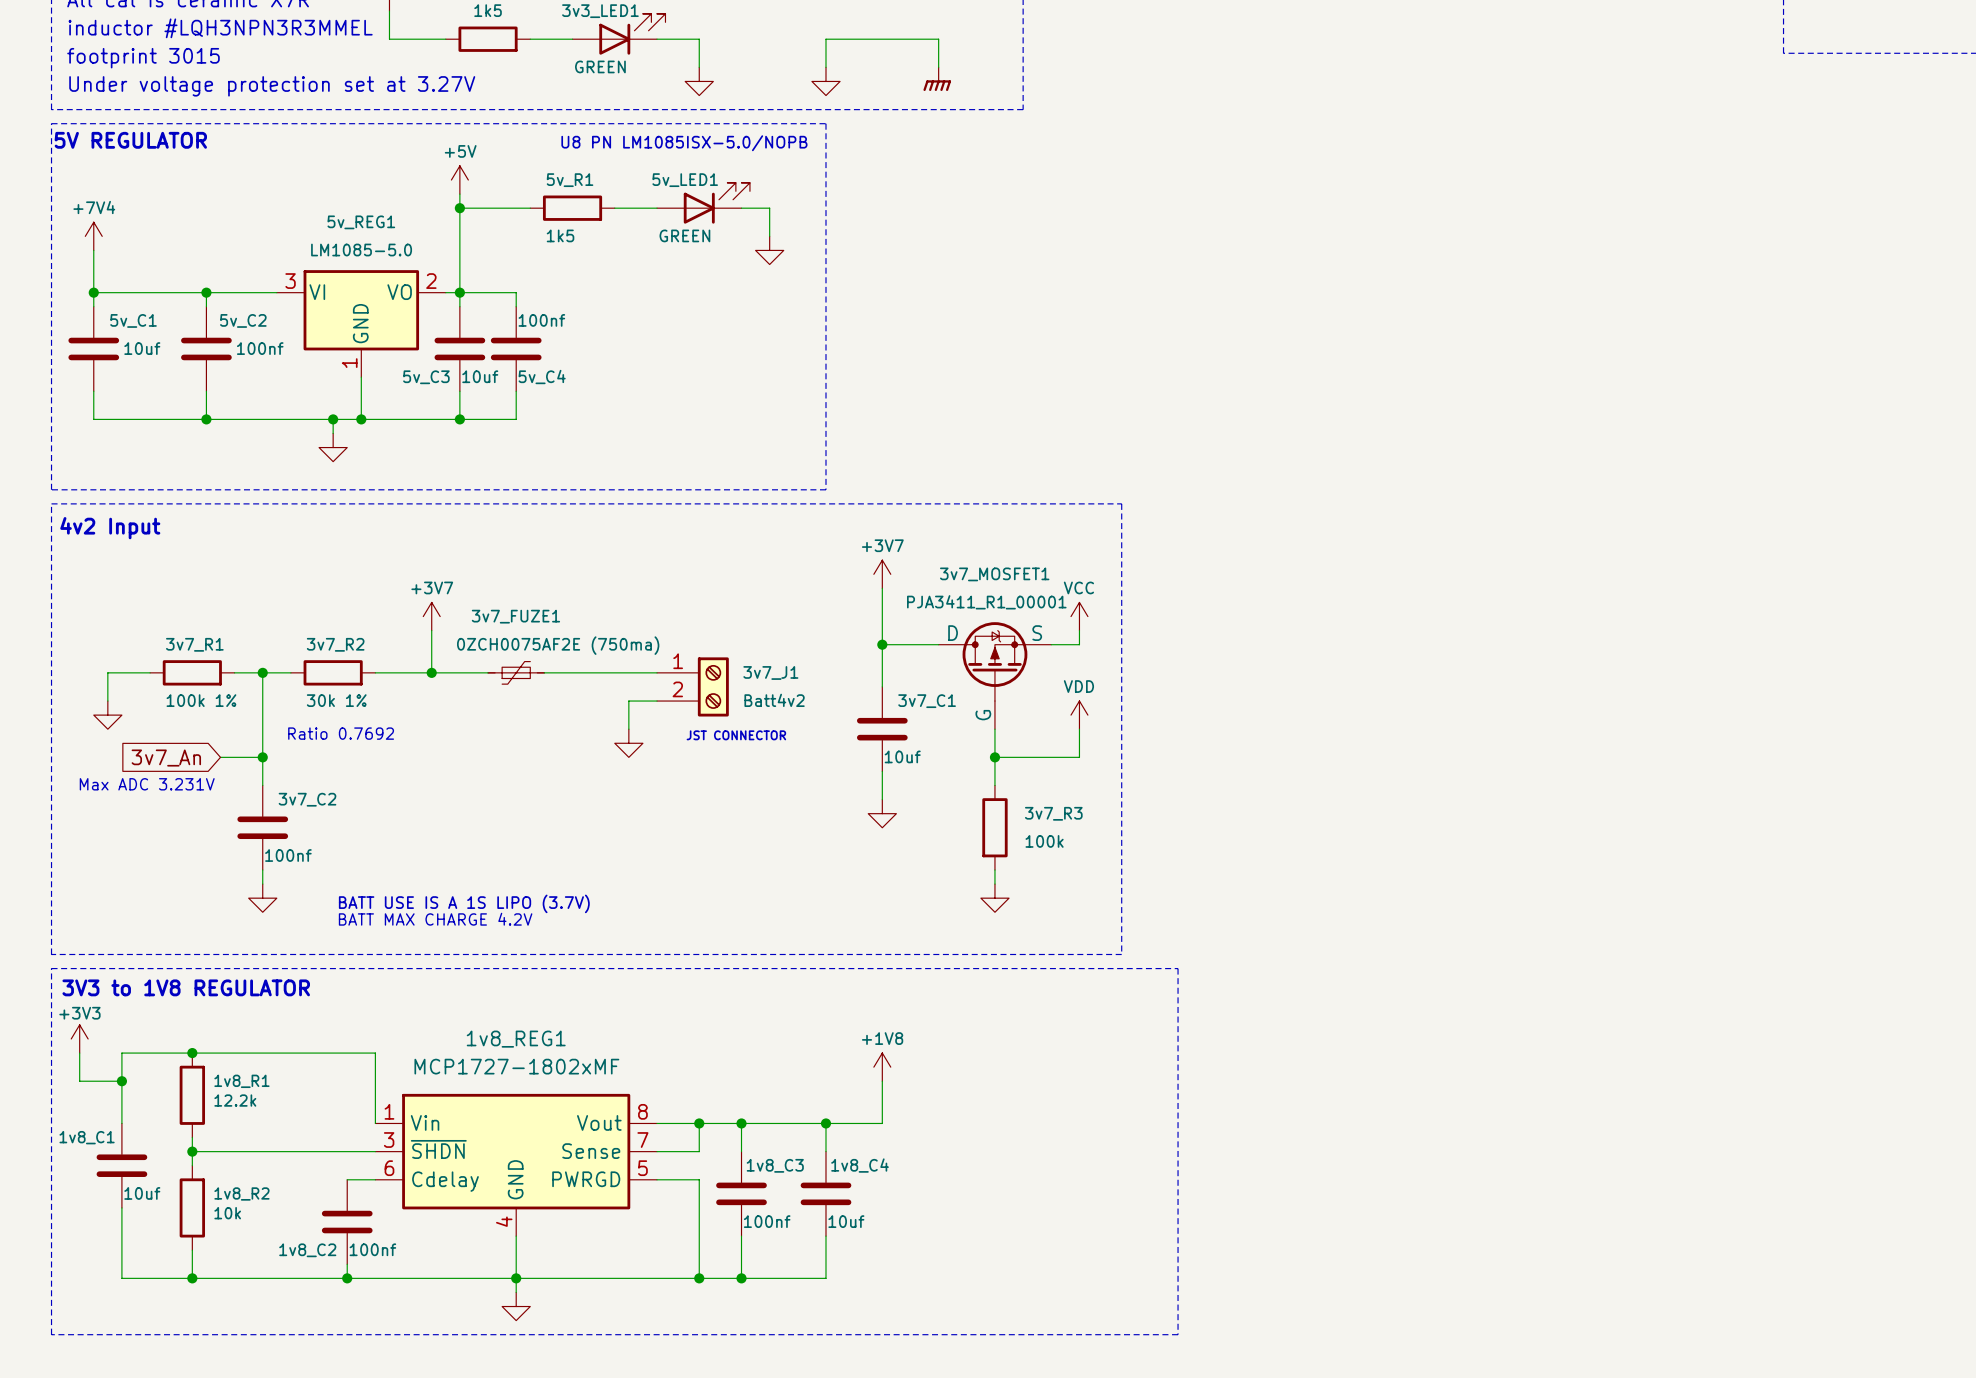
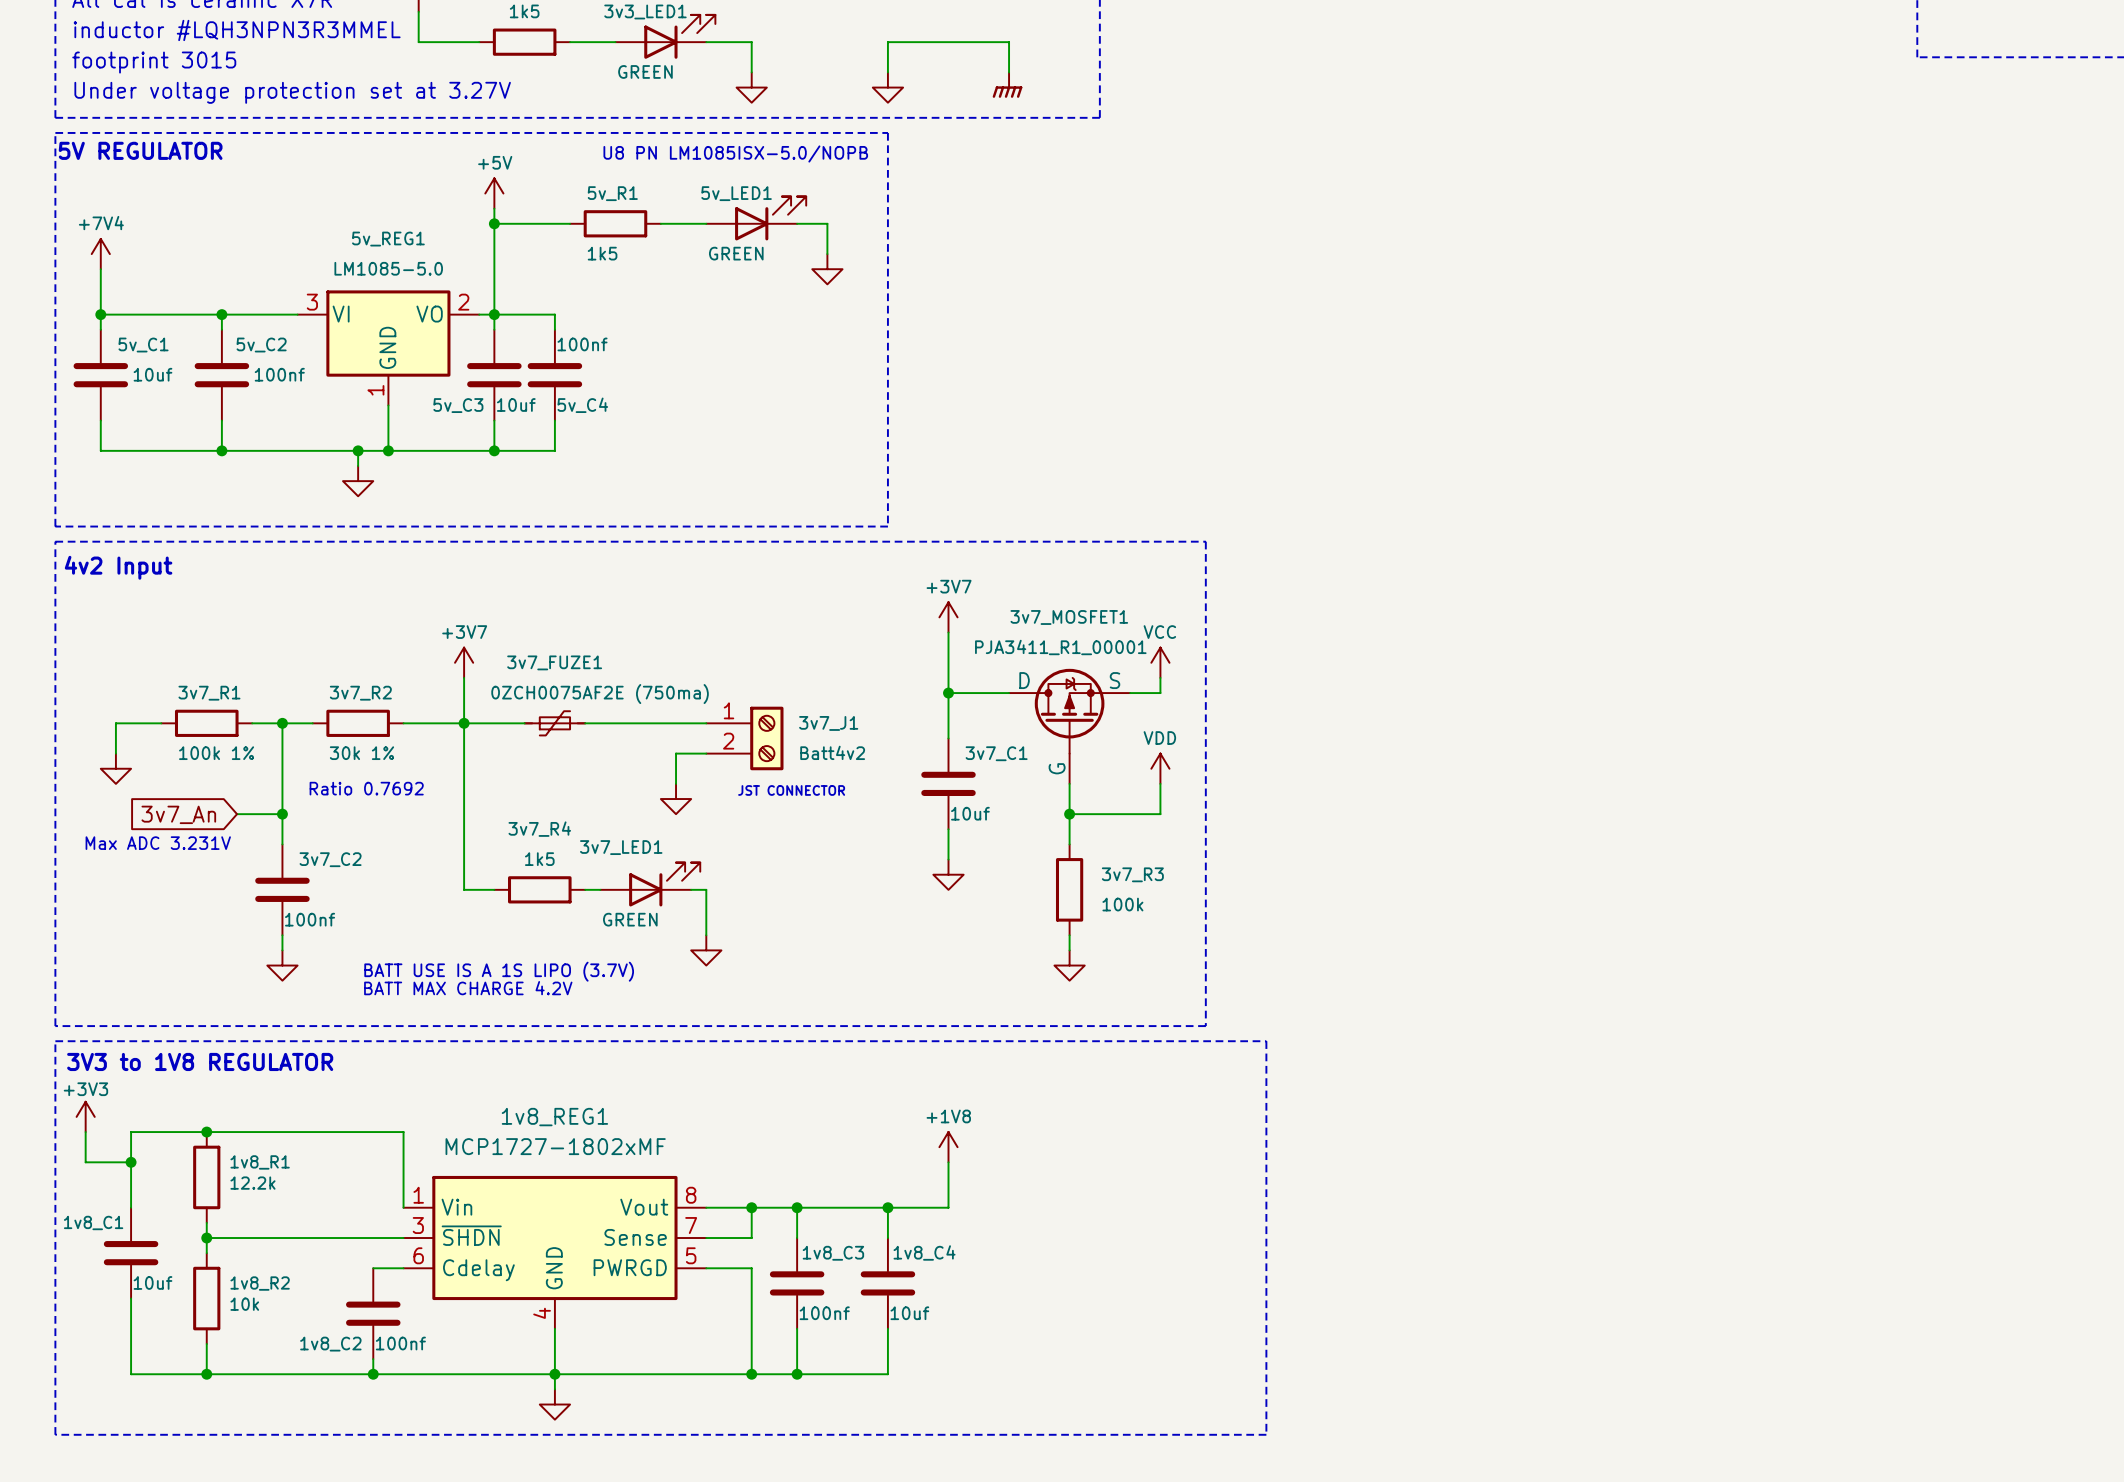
wire: none -> (464, 723) (464, 889) (494, 889)
3v7_LED1: none -> GREEN (650, 884)
3v7_R4: none -> 1k5 (539, 889)
wire: none -> (585, 889) (600, 889)
wire: none -> (691, 889) (706, 889) (706, 935)
power symbol: none -> (706, 950)

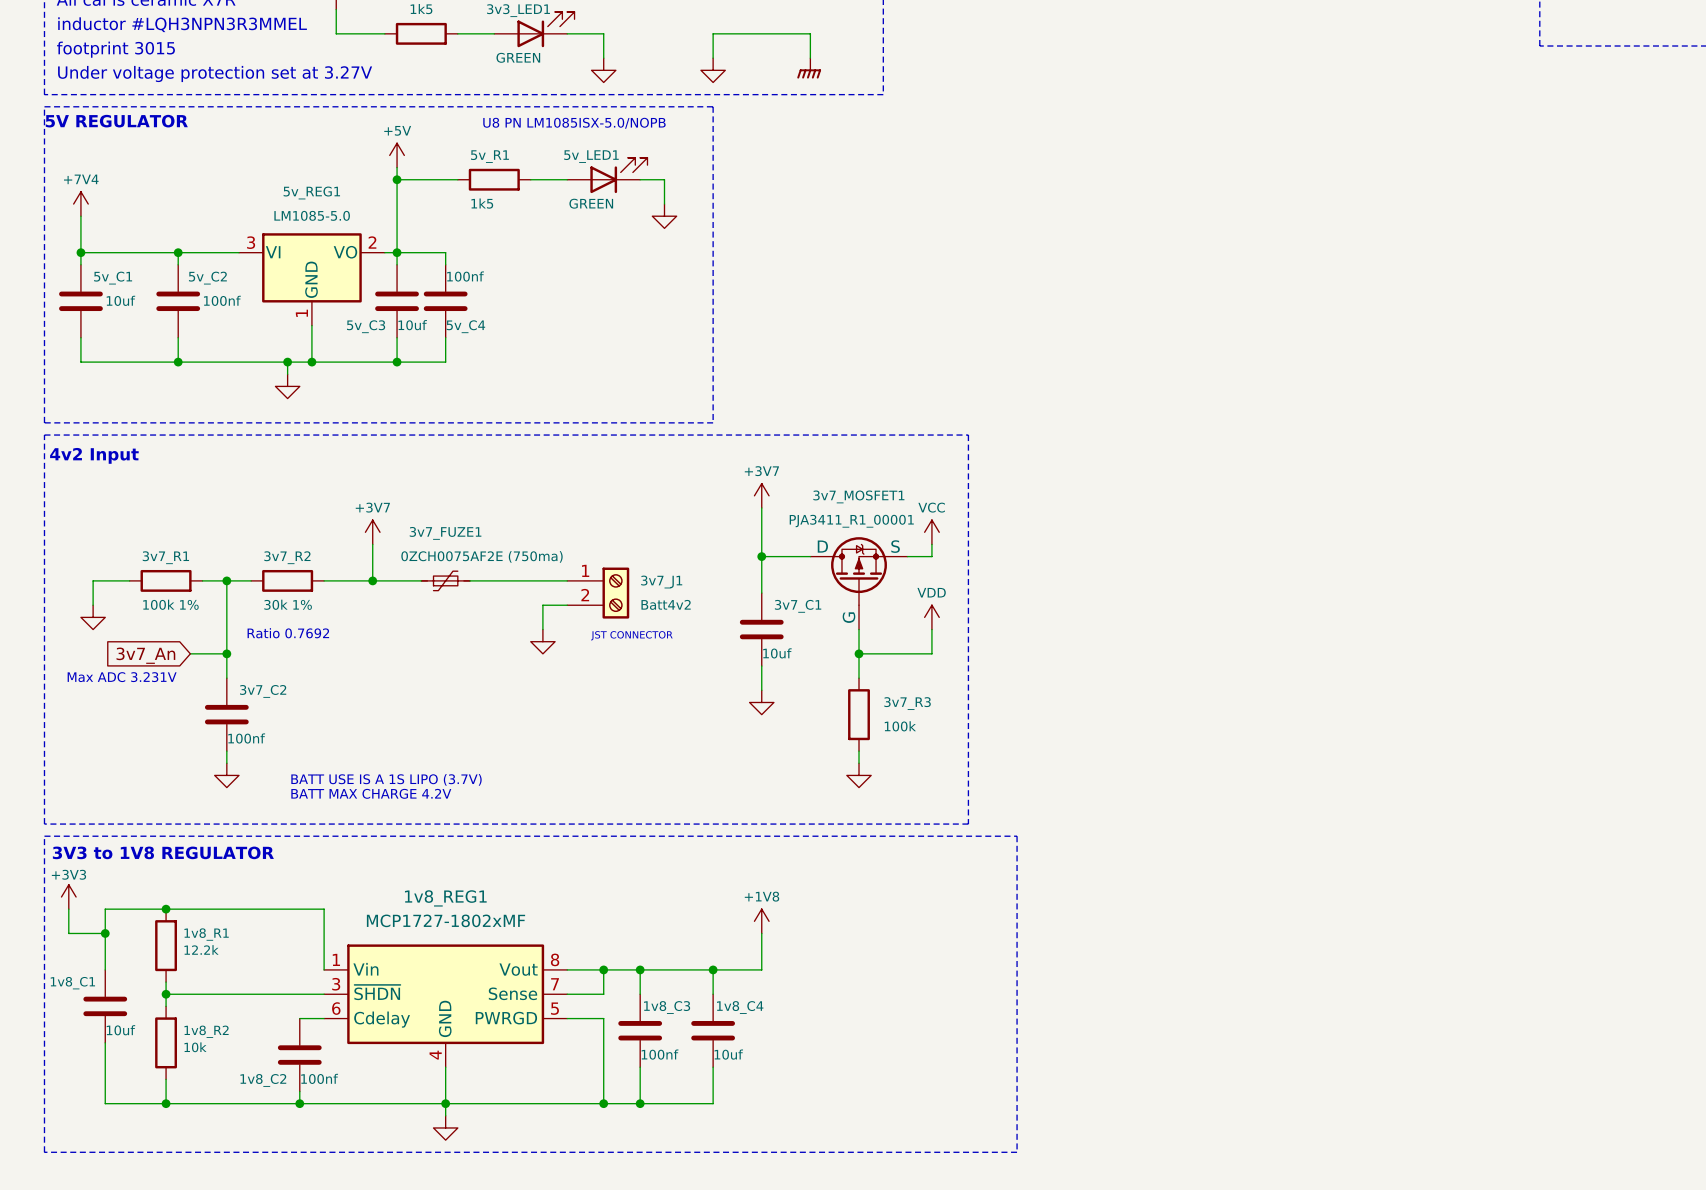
wire: (464, 723) (464, 889) (494, 889) -> none
3v7_LED1: GREEN (650, 884) -> none
3v7_R4: 1k5 (539, 889) -> none
wire: (585, 889) (600, 889) -> none
wire: (691, 889) (706, 889) (706, 935) -> none
power symbol: (706, 950) -> none

